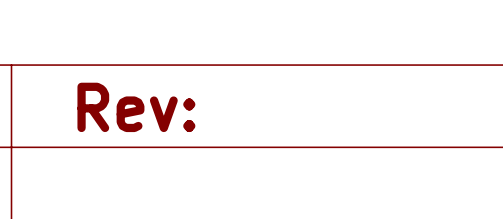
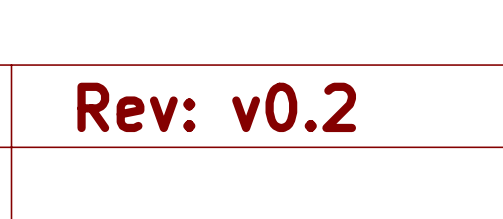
title block: Rev: (136, 107) -> Rev: v0.2 (216, 107)

